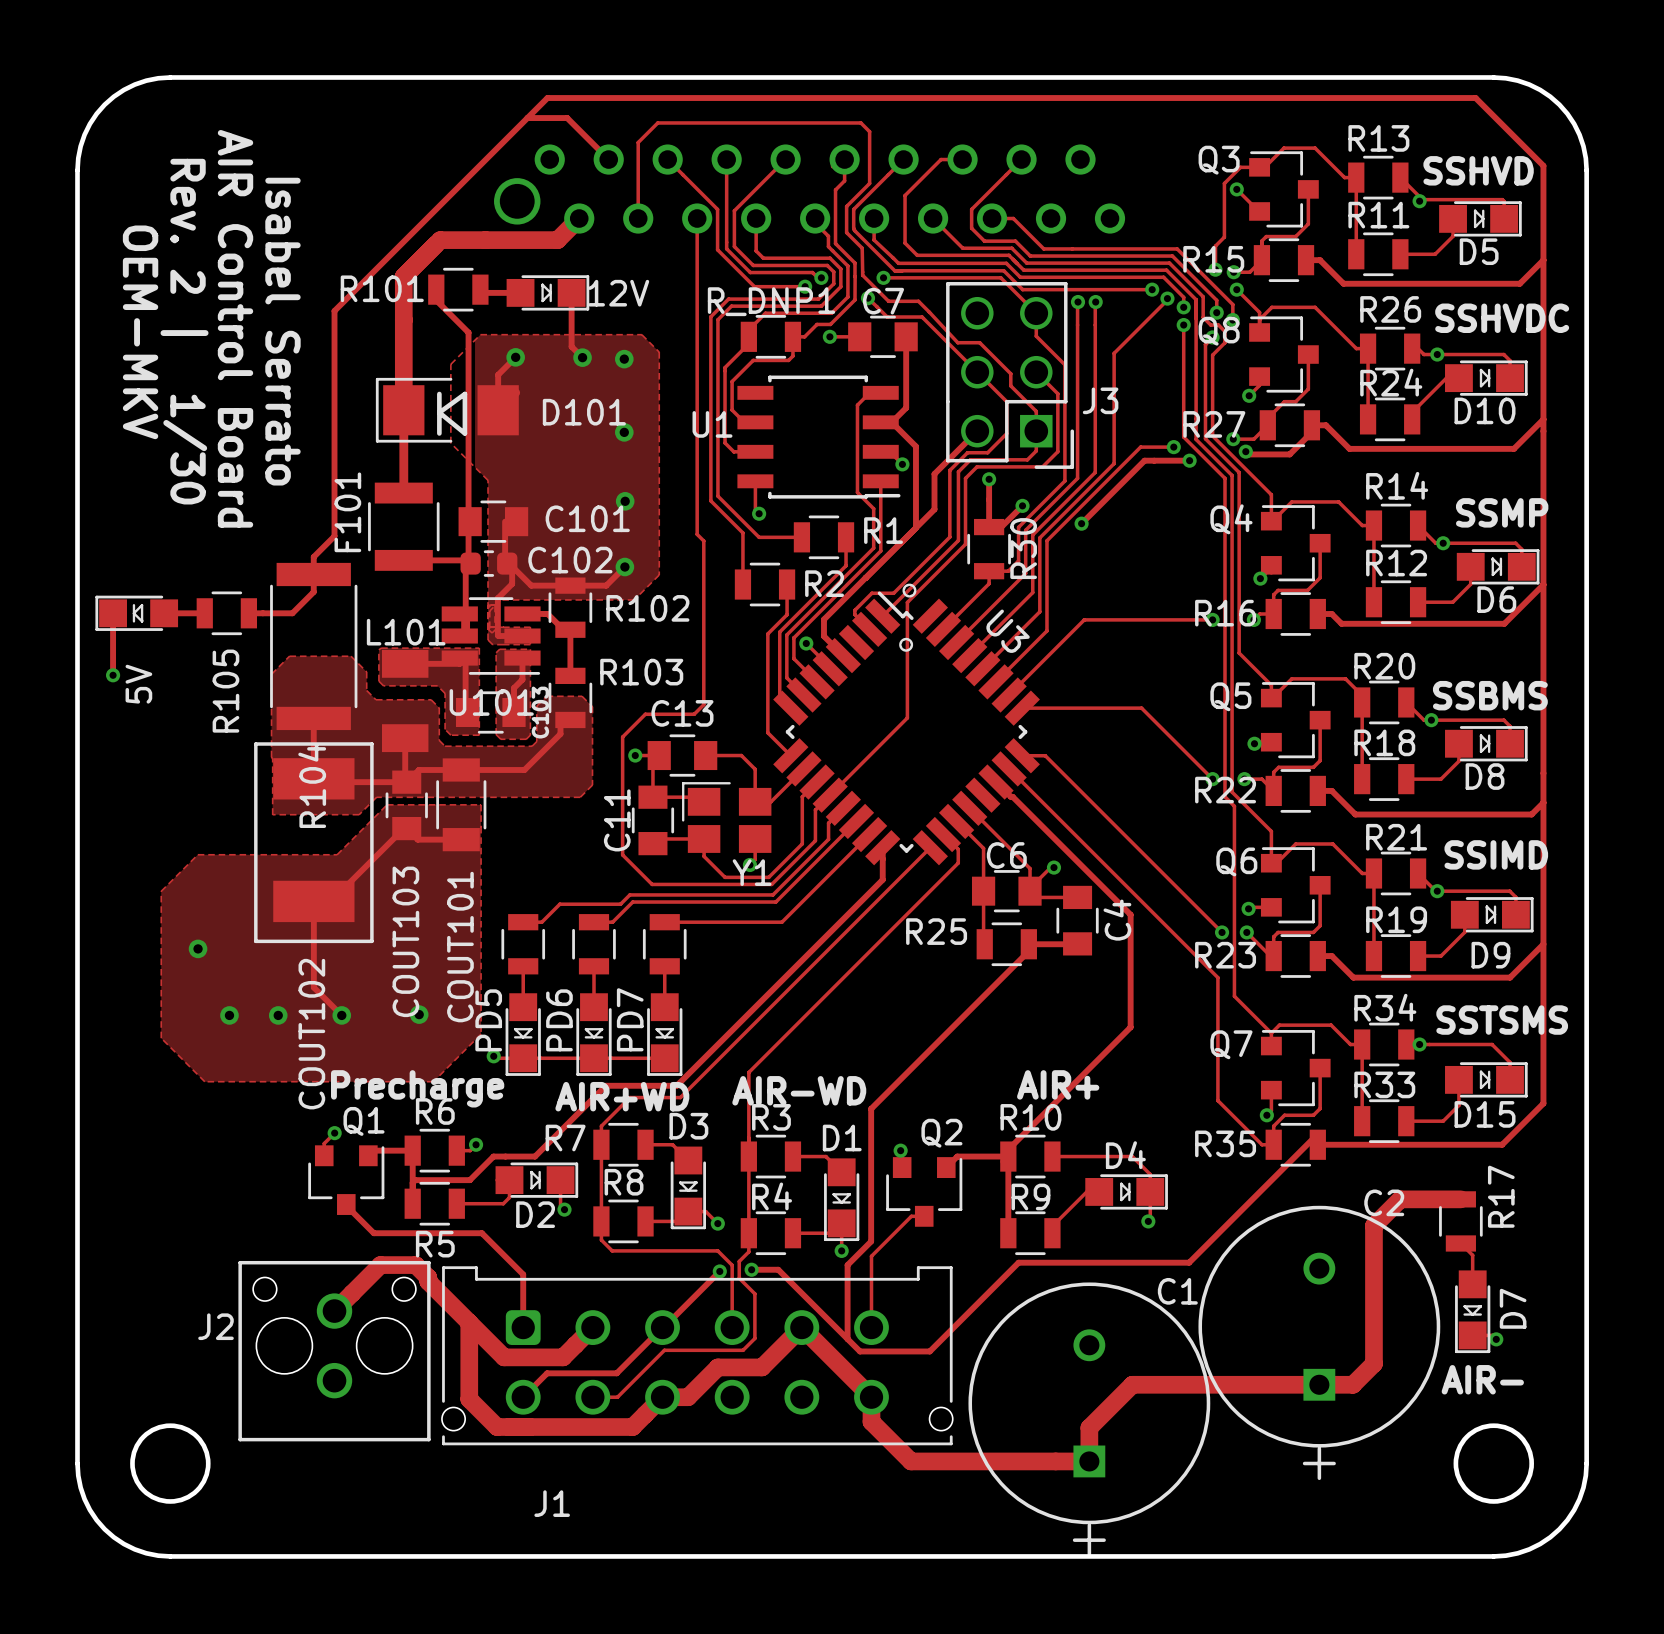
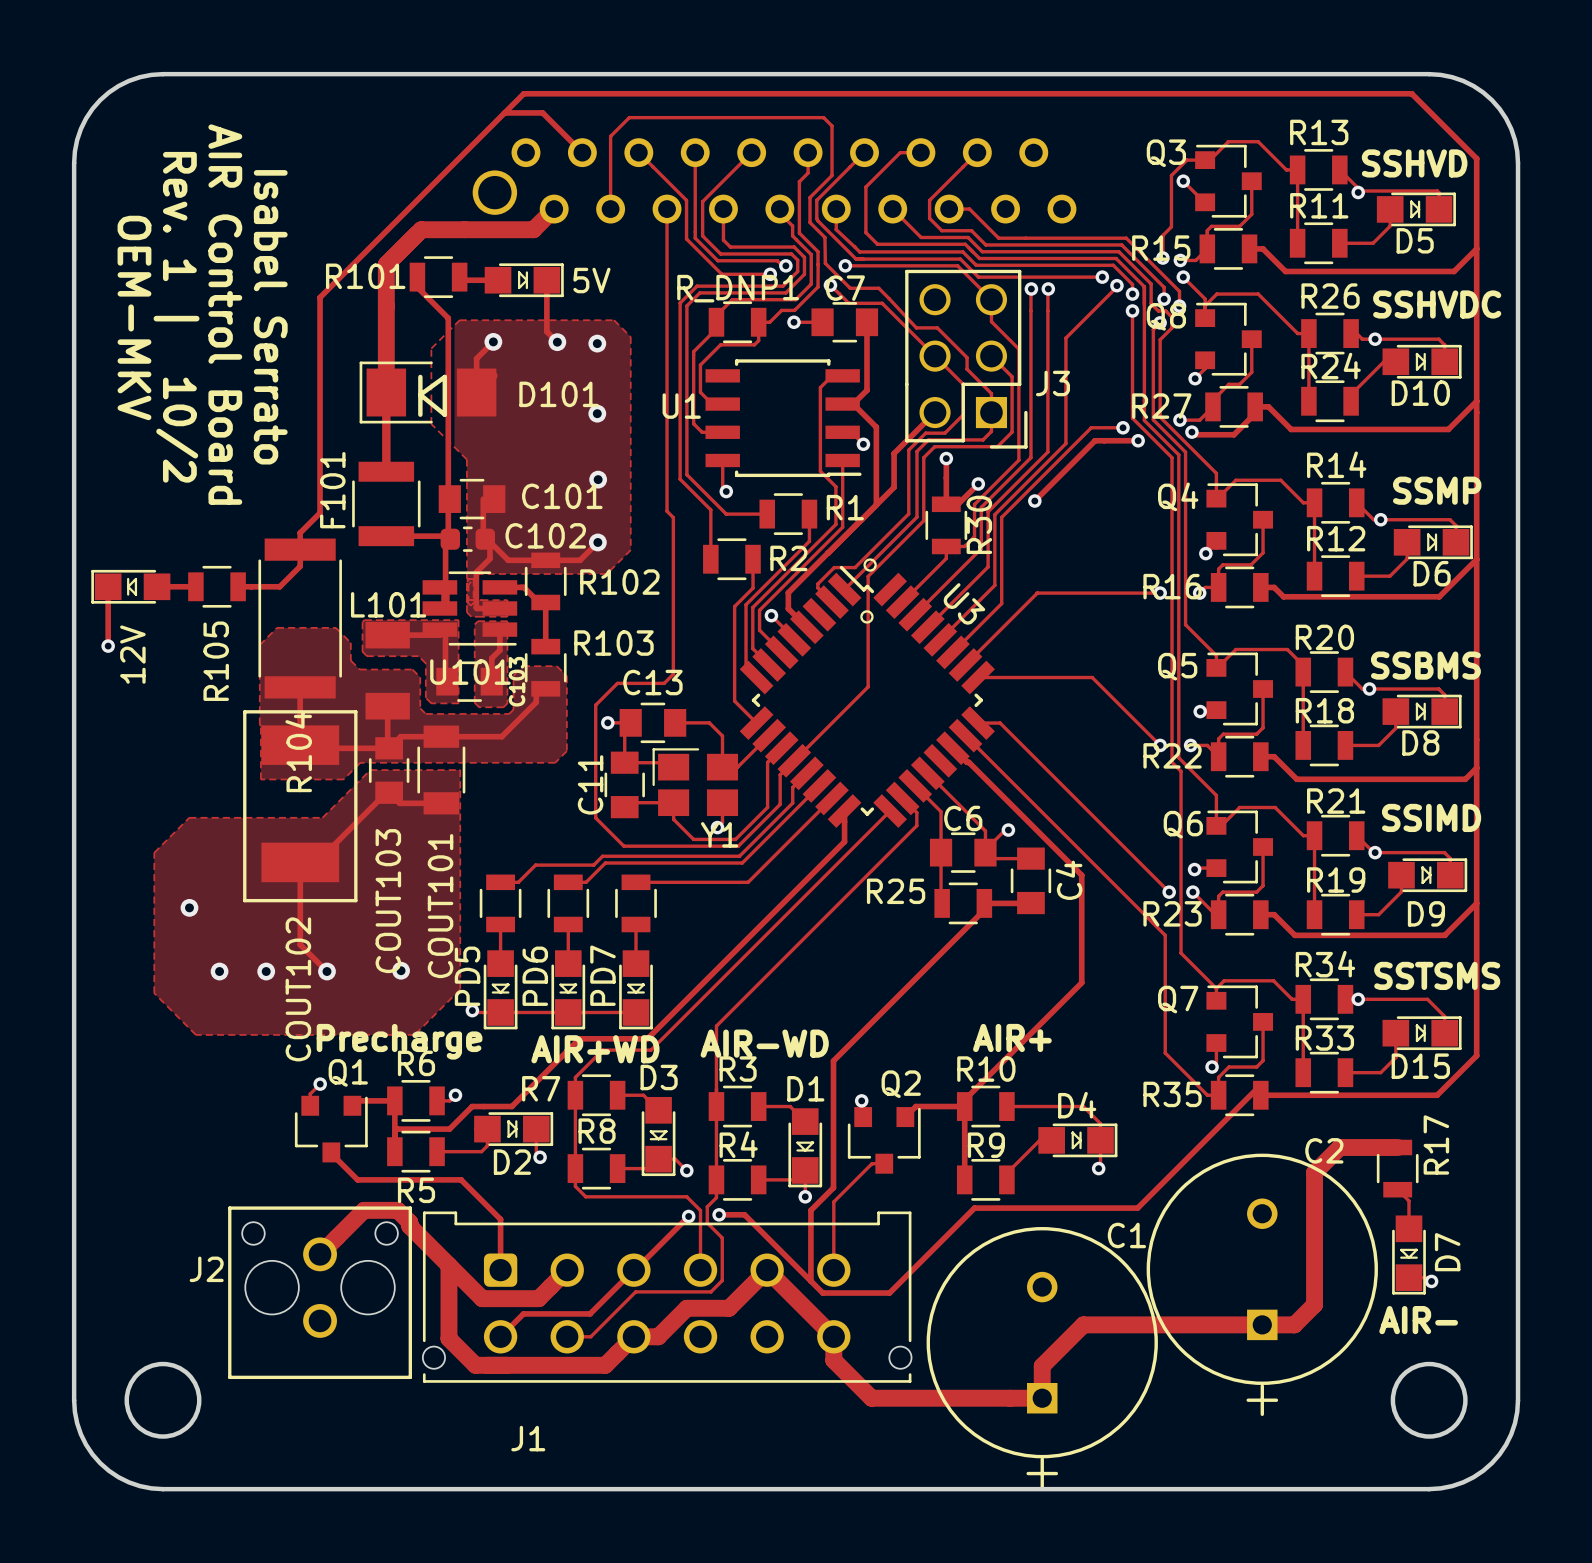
12V name: 12V (618, 293) -> 5V (591, 280)
text: Rev. 2 | 1/30 (184, 331) -> Rev. 1 | 10/2 (176, 317)
5V name: 5V (138, 684) -> 12V (132, 654)

